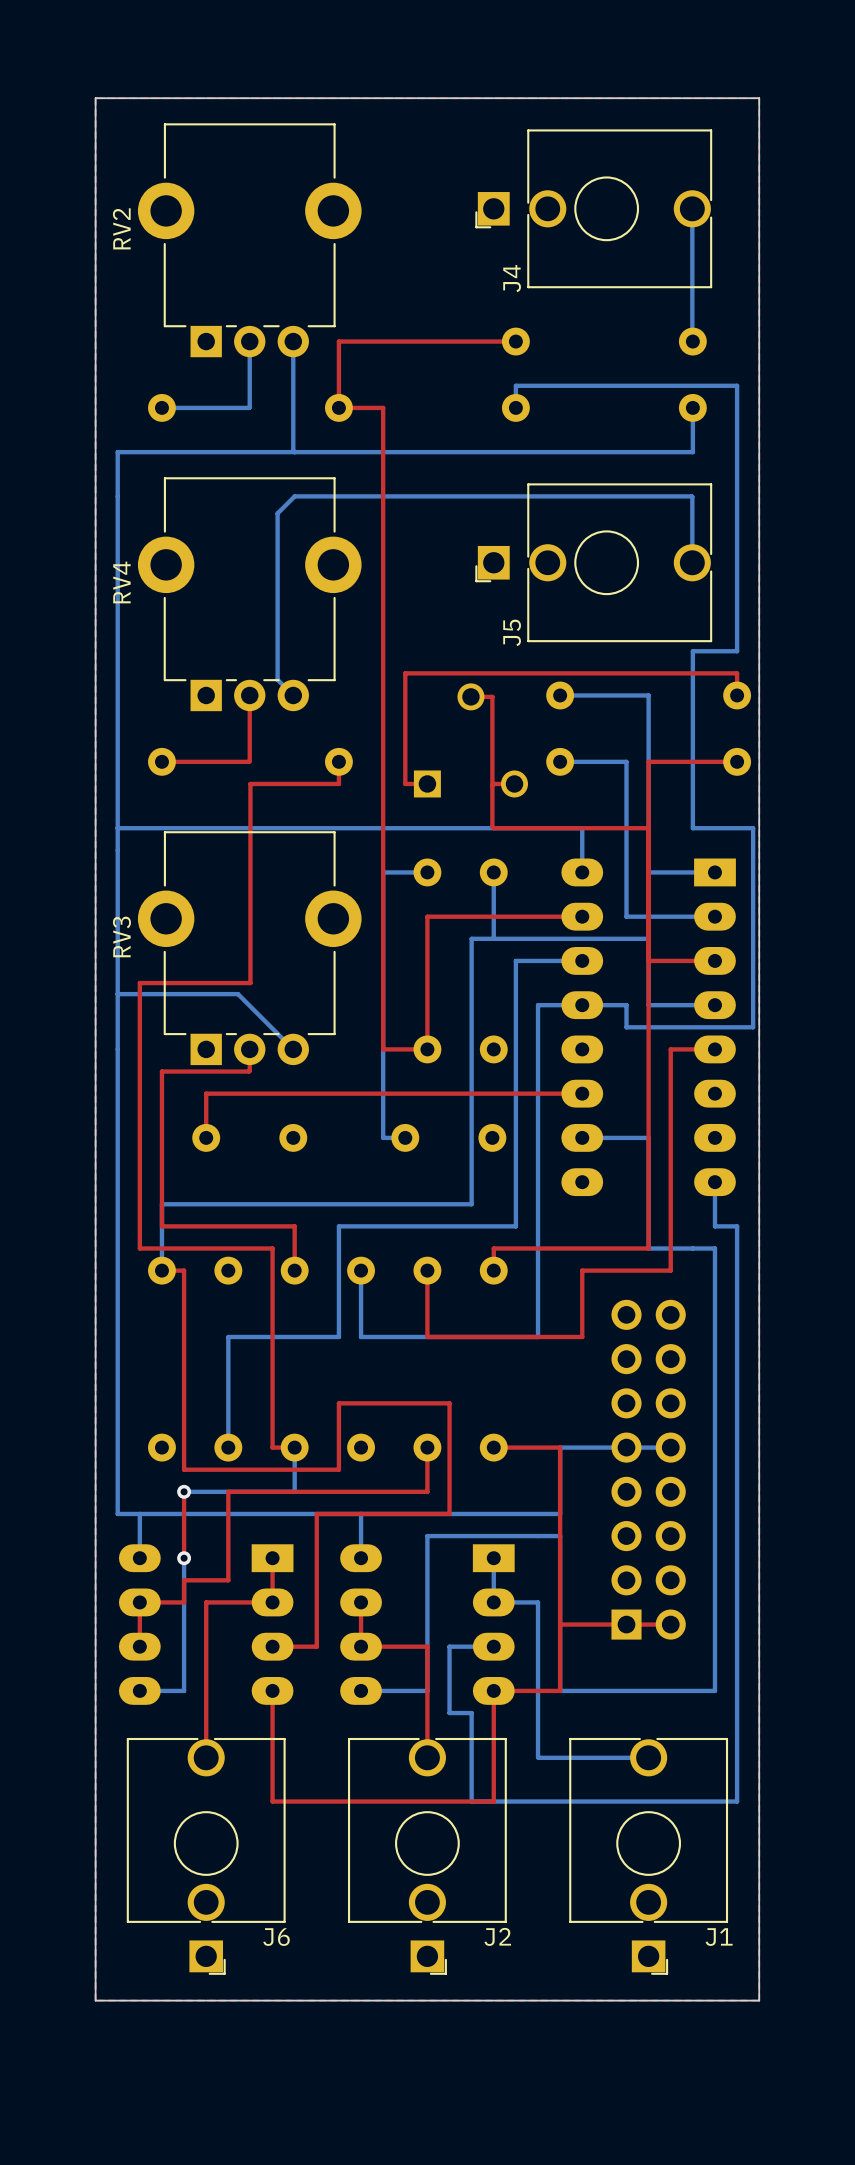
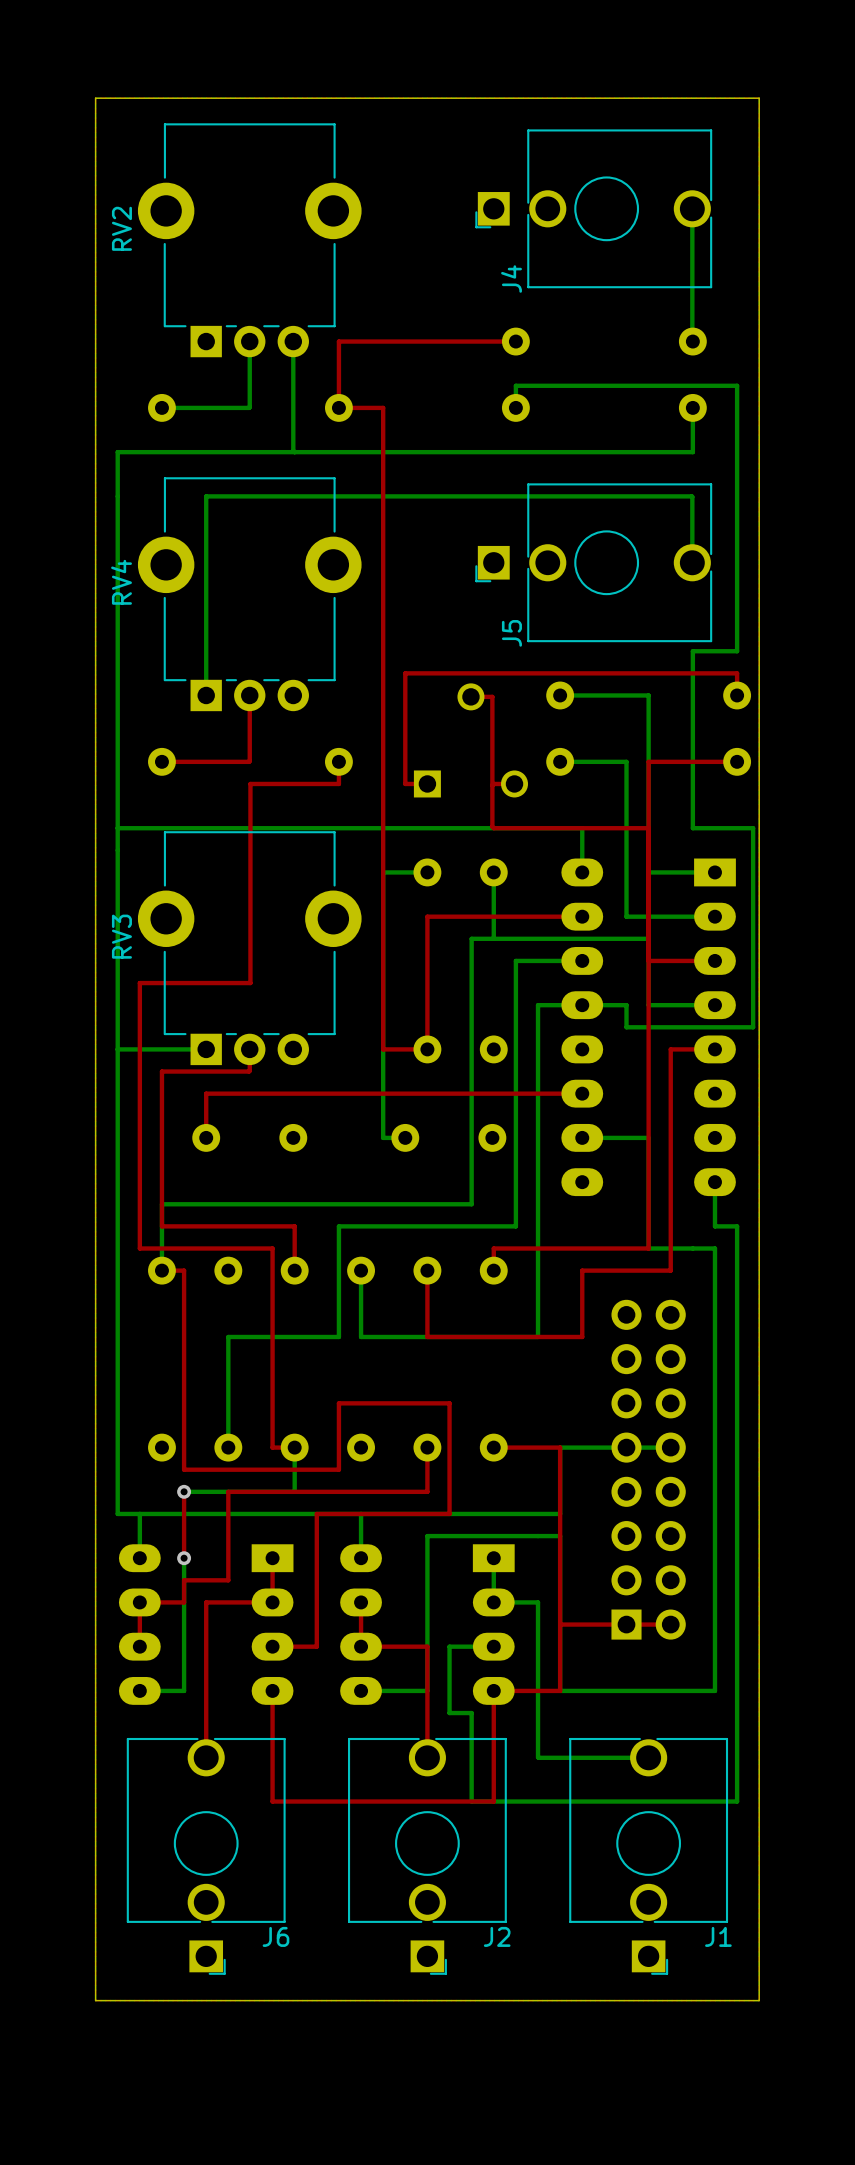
bottom track: (294, 496) (277, 513) (277, 679) (293, 695) -> (294, 496) (206, 496) (206, 695)
bottom track: (117, 994) (237, 994) (293, 1049) -> none
bottom track: none -> (117, 1049) (206, 1049)

